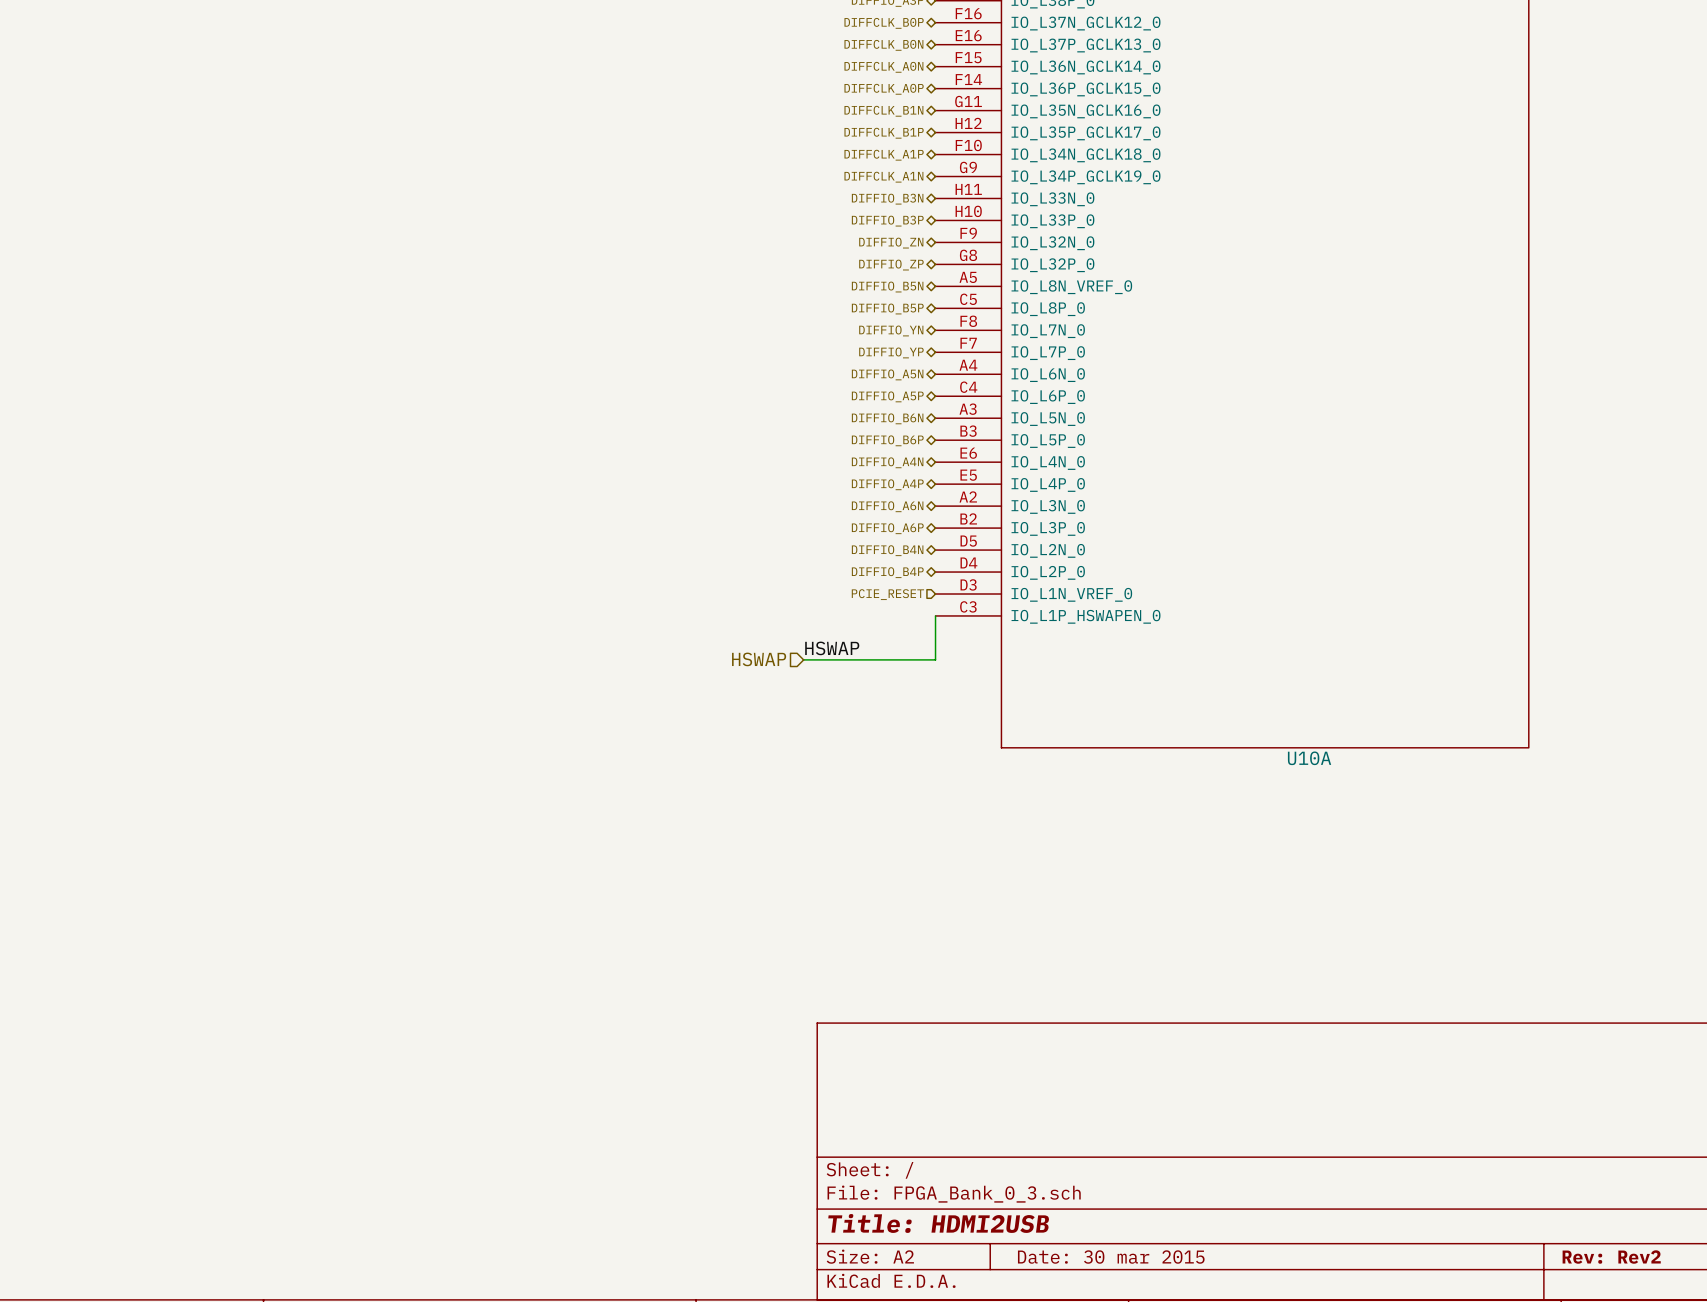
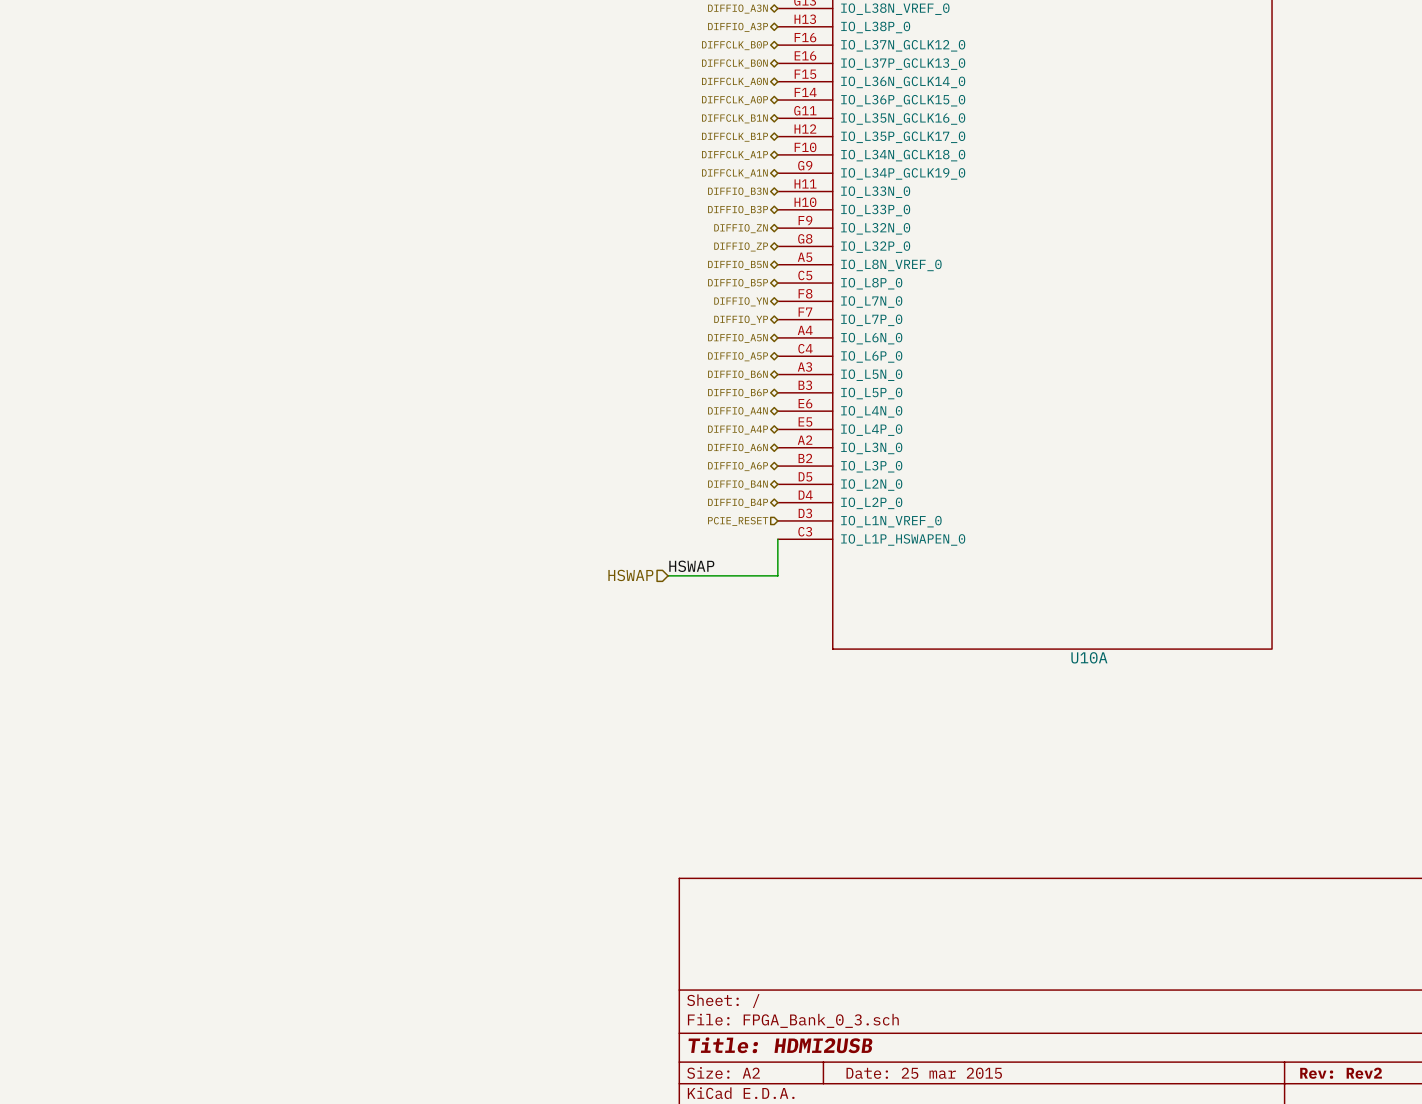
title block: Date: 30 mar 2015 (1111, 1257) -> Date: 25 mar 2015 (924, 1073)

